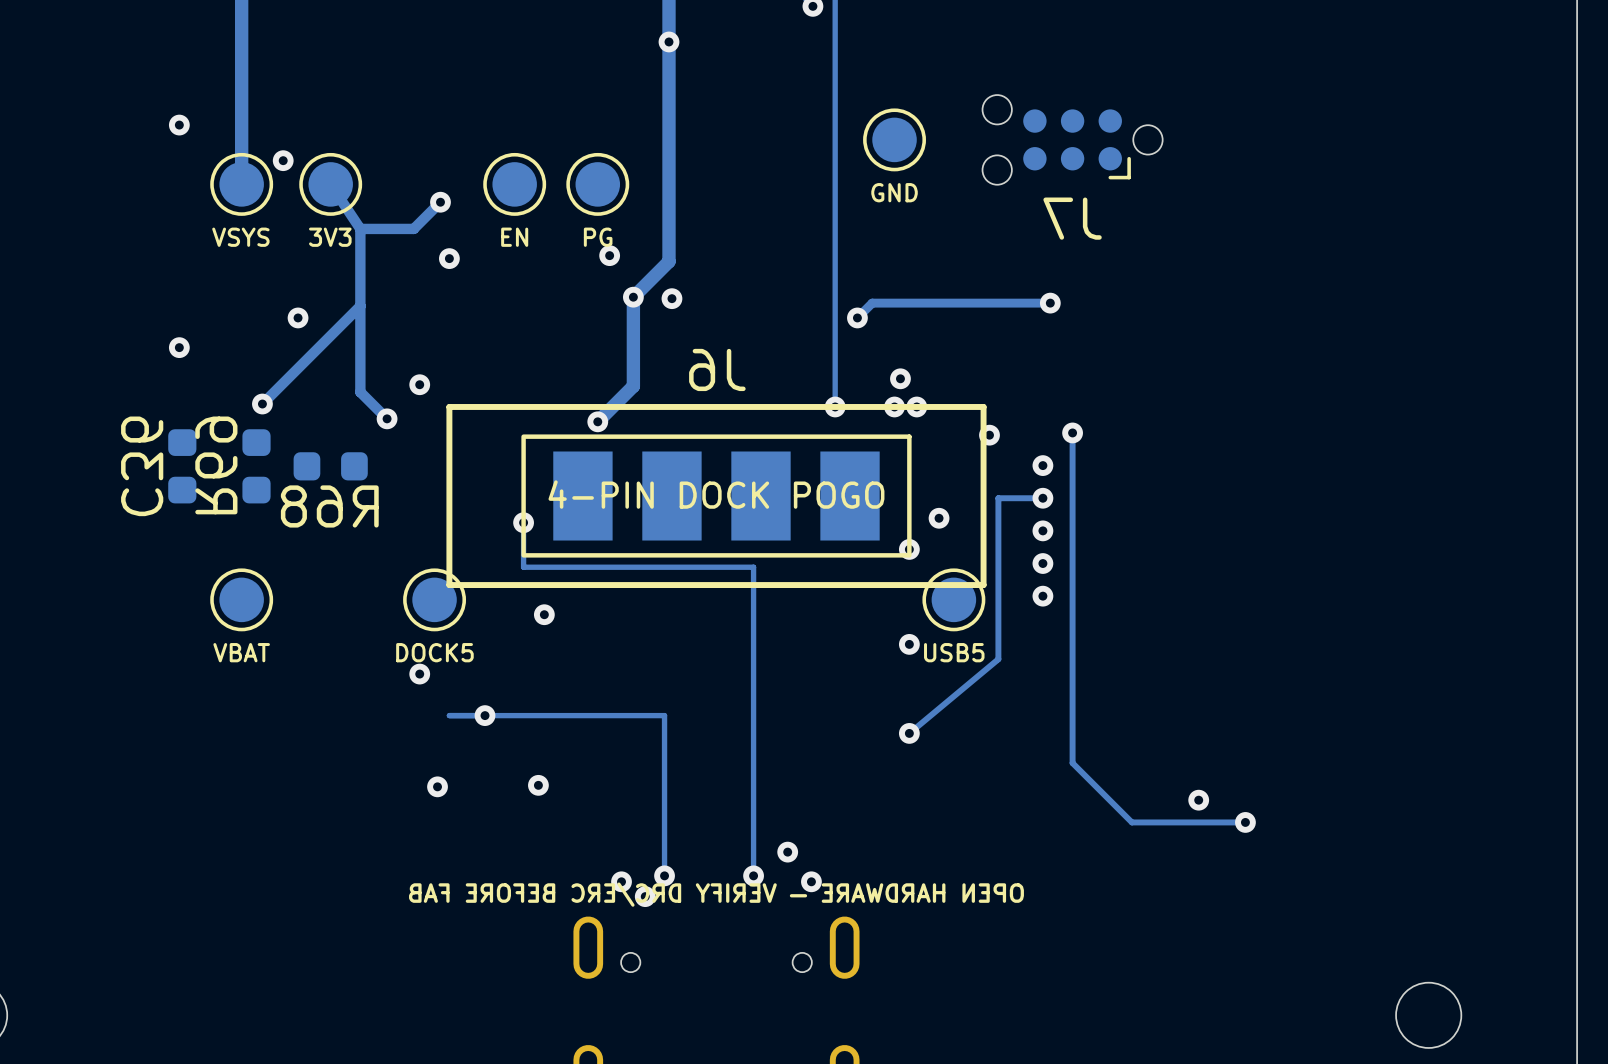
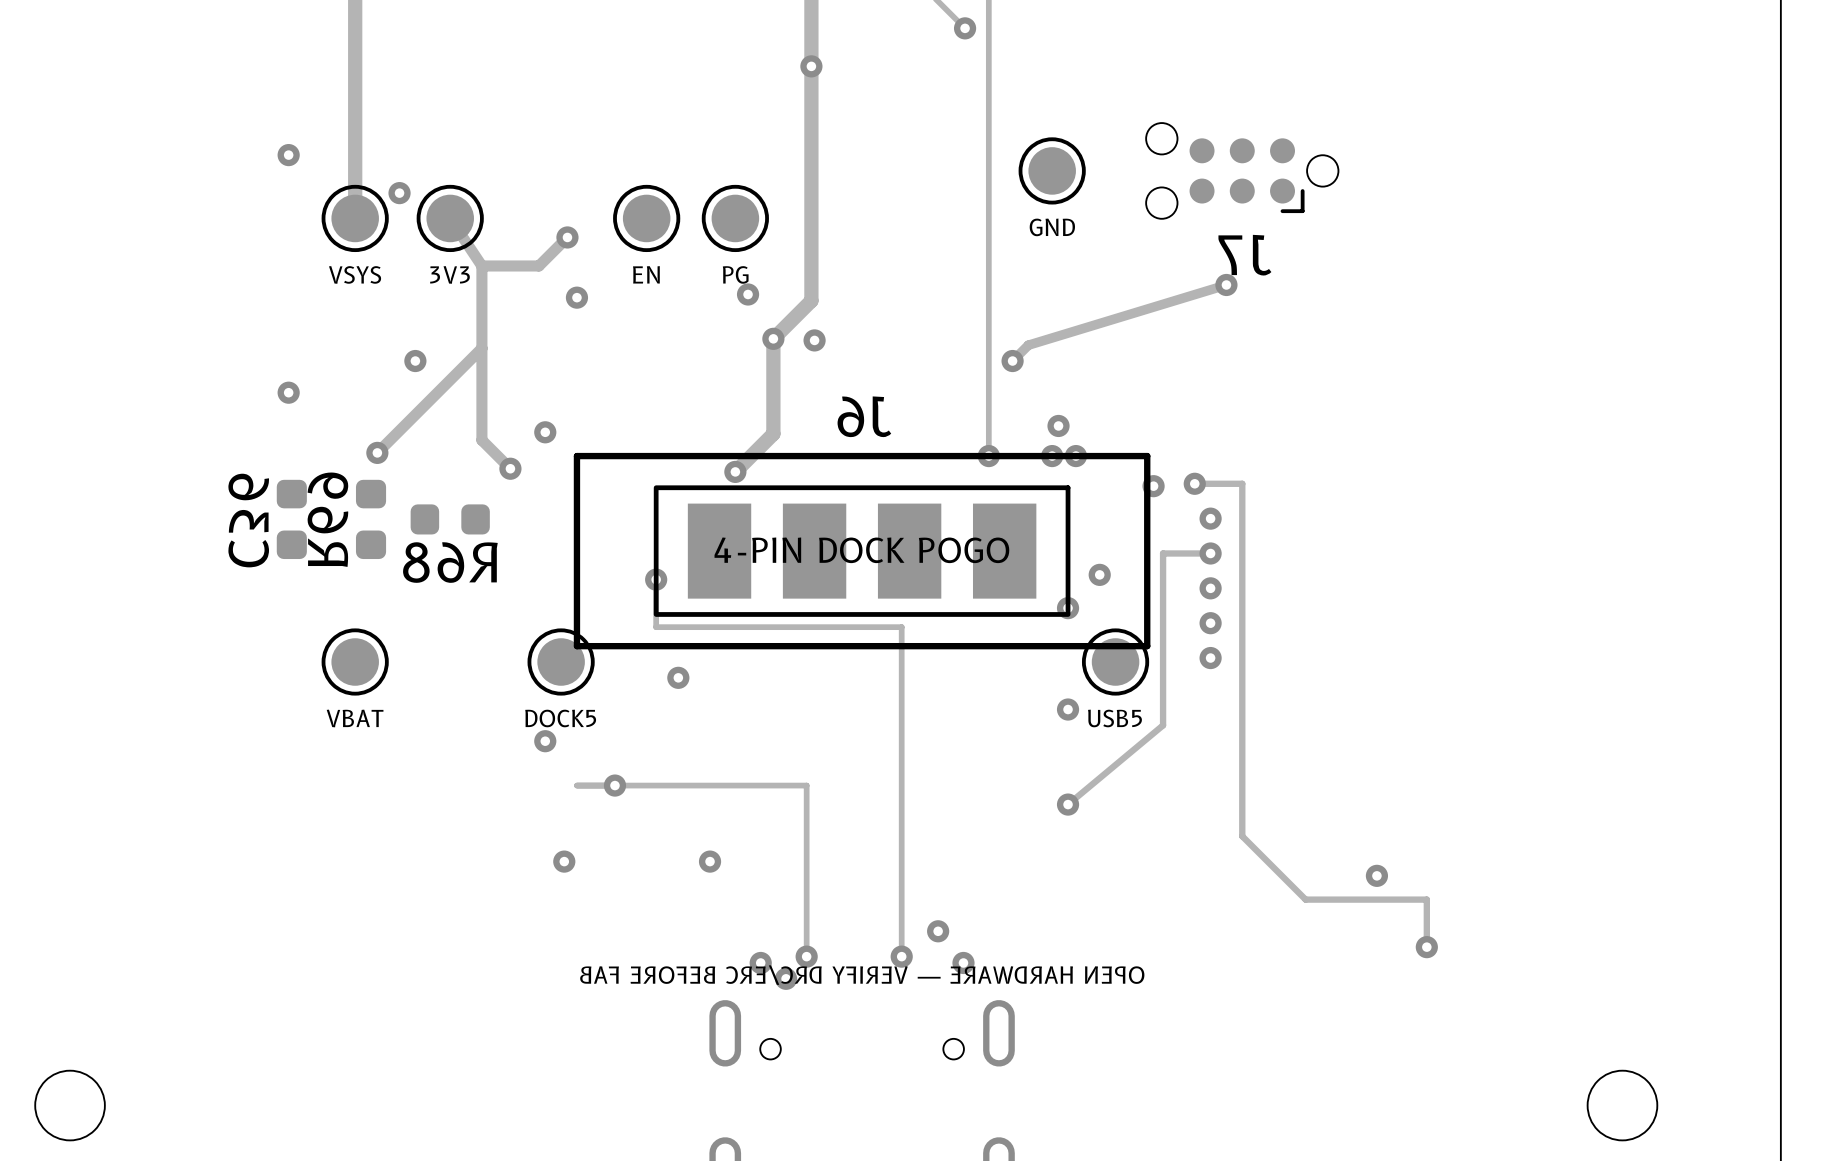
track: (1050, 303) (872, 303) -> (1226, 284) (1028, 345)
via position: (1050, 303) -> (1226, 284)
track: none -> (1242, 483) (1194, 483)
via position: (1072, 432) -> (1194, 483)
via position: (538, 785) -> (710, 861)
track: none -> (1426, 899) (1426, 947)
via position: (1245, 822) -> (1426, 947)

